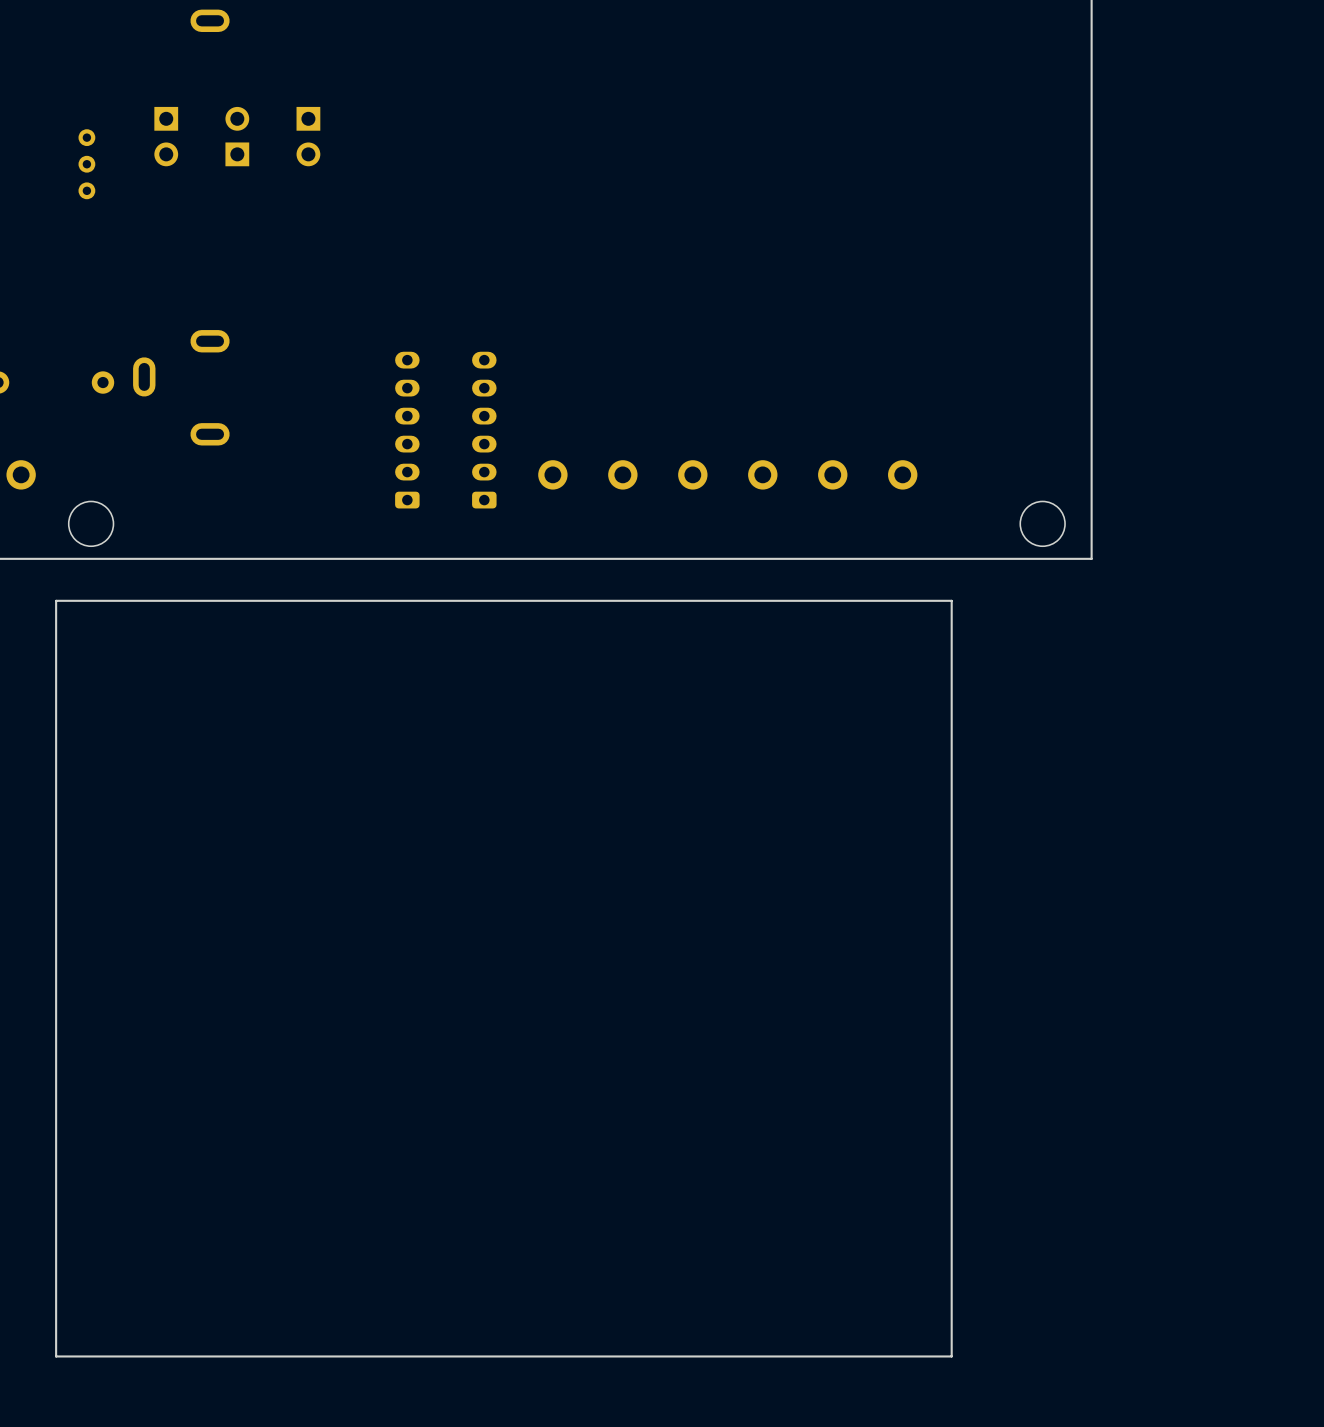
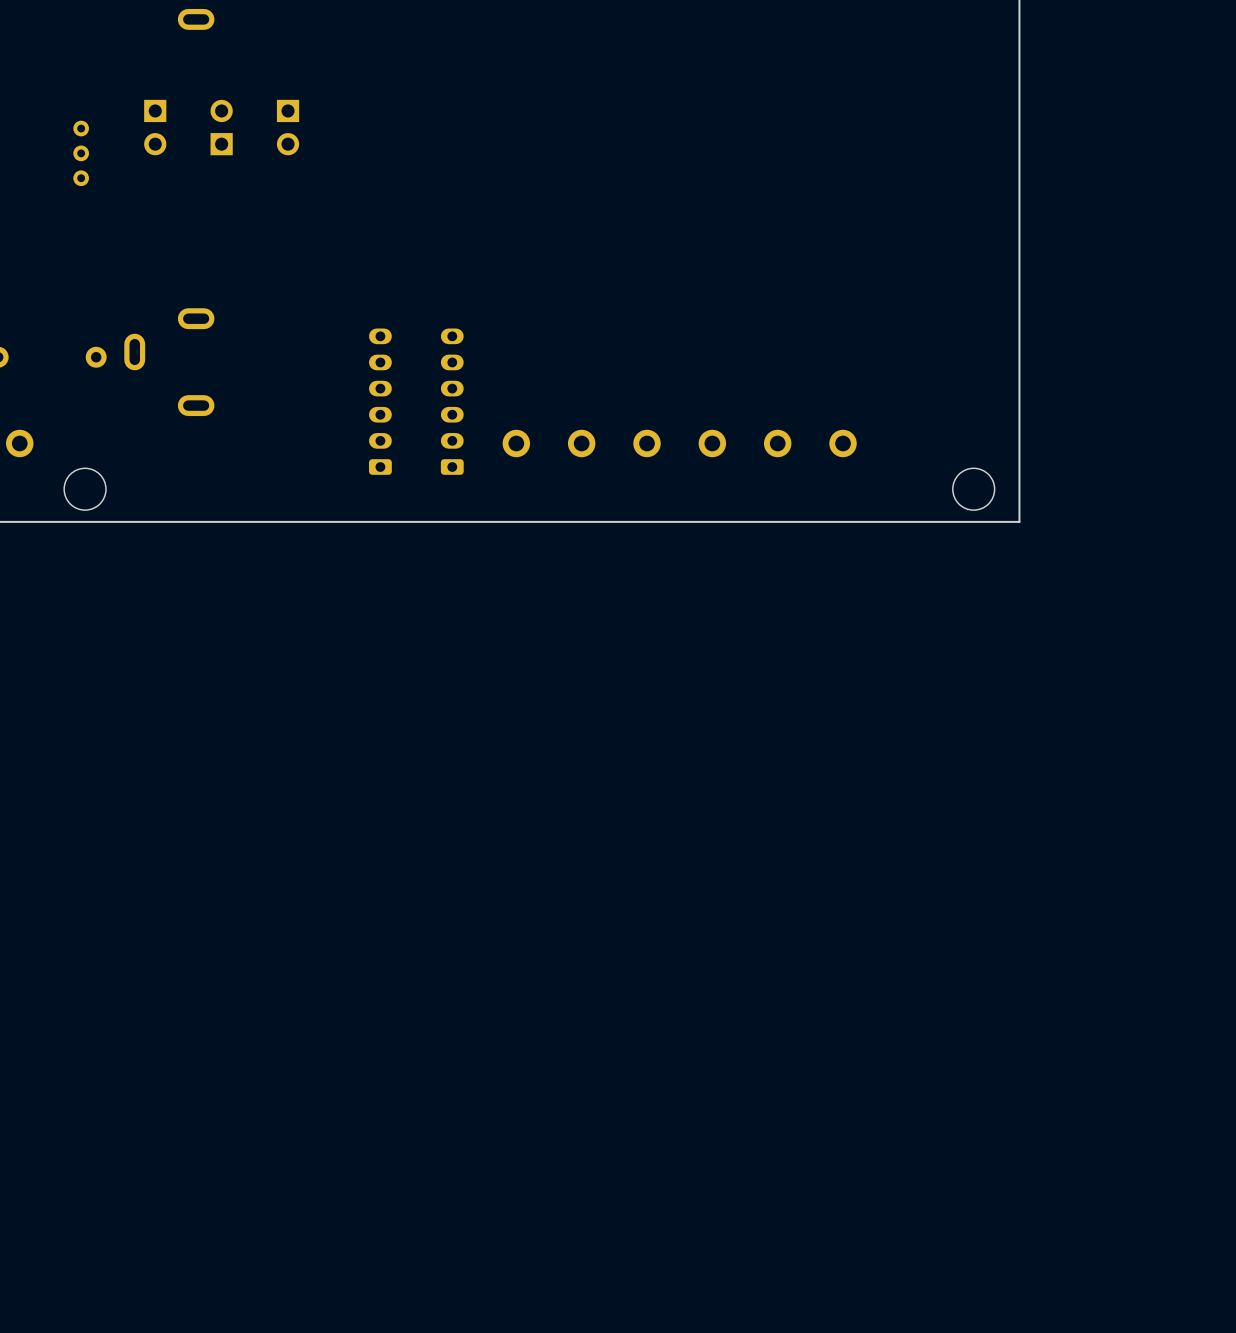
board edge: (951, 600) (56, 600) (56, 1356) (951, 1356) (951, 600) -> none

